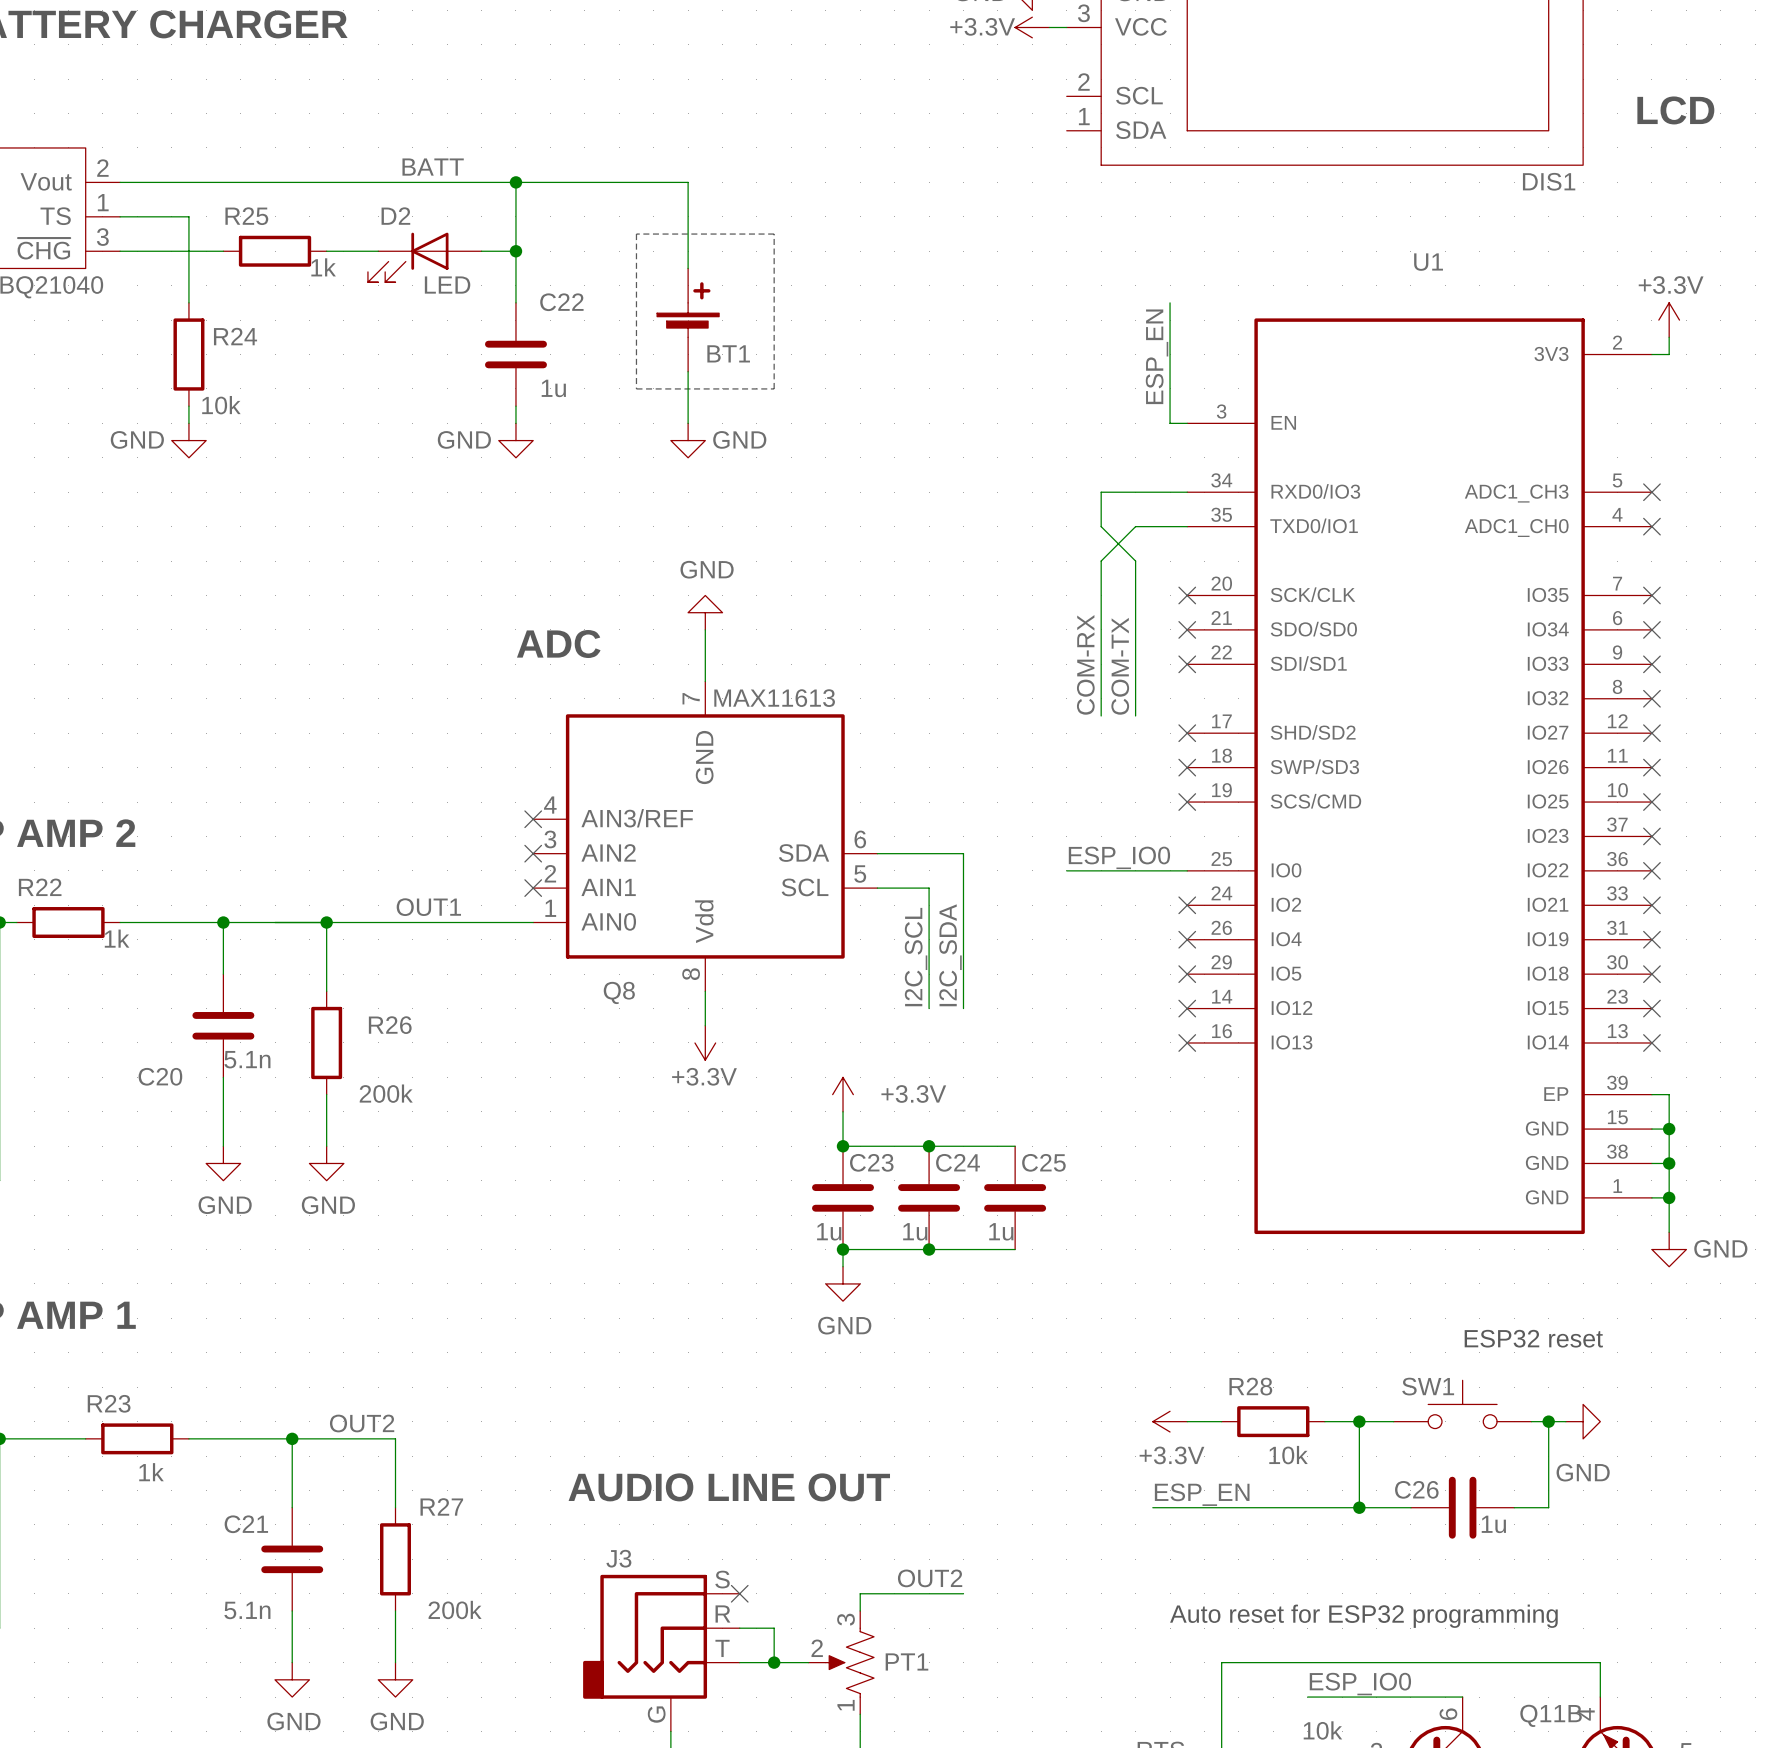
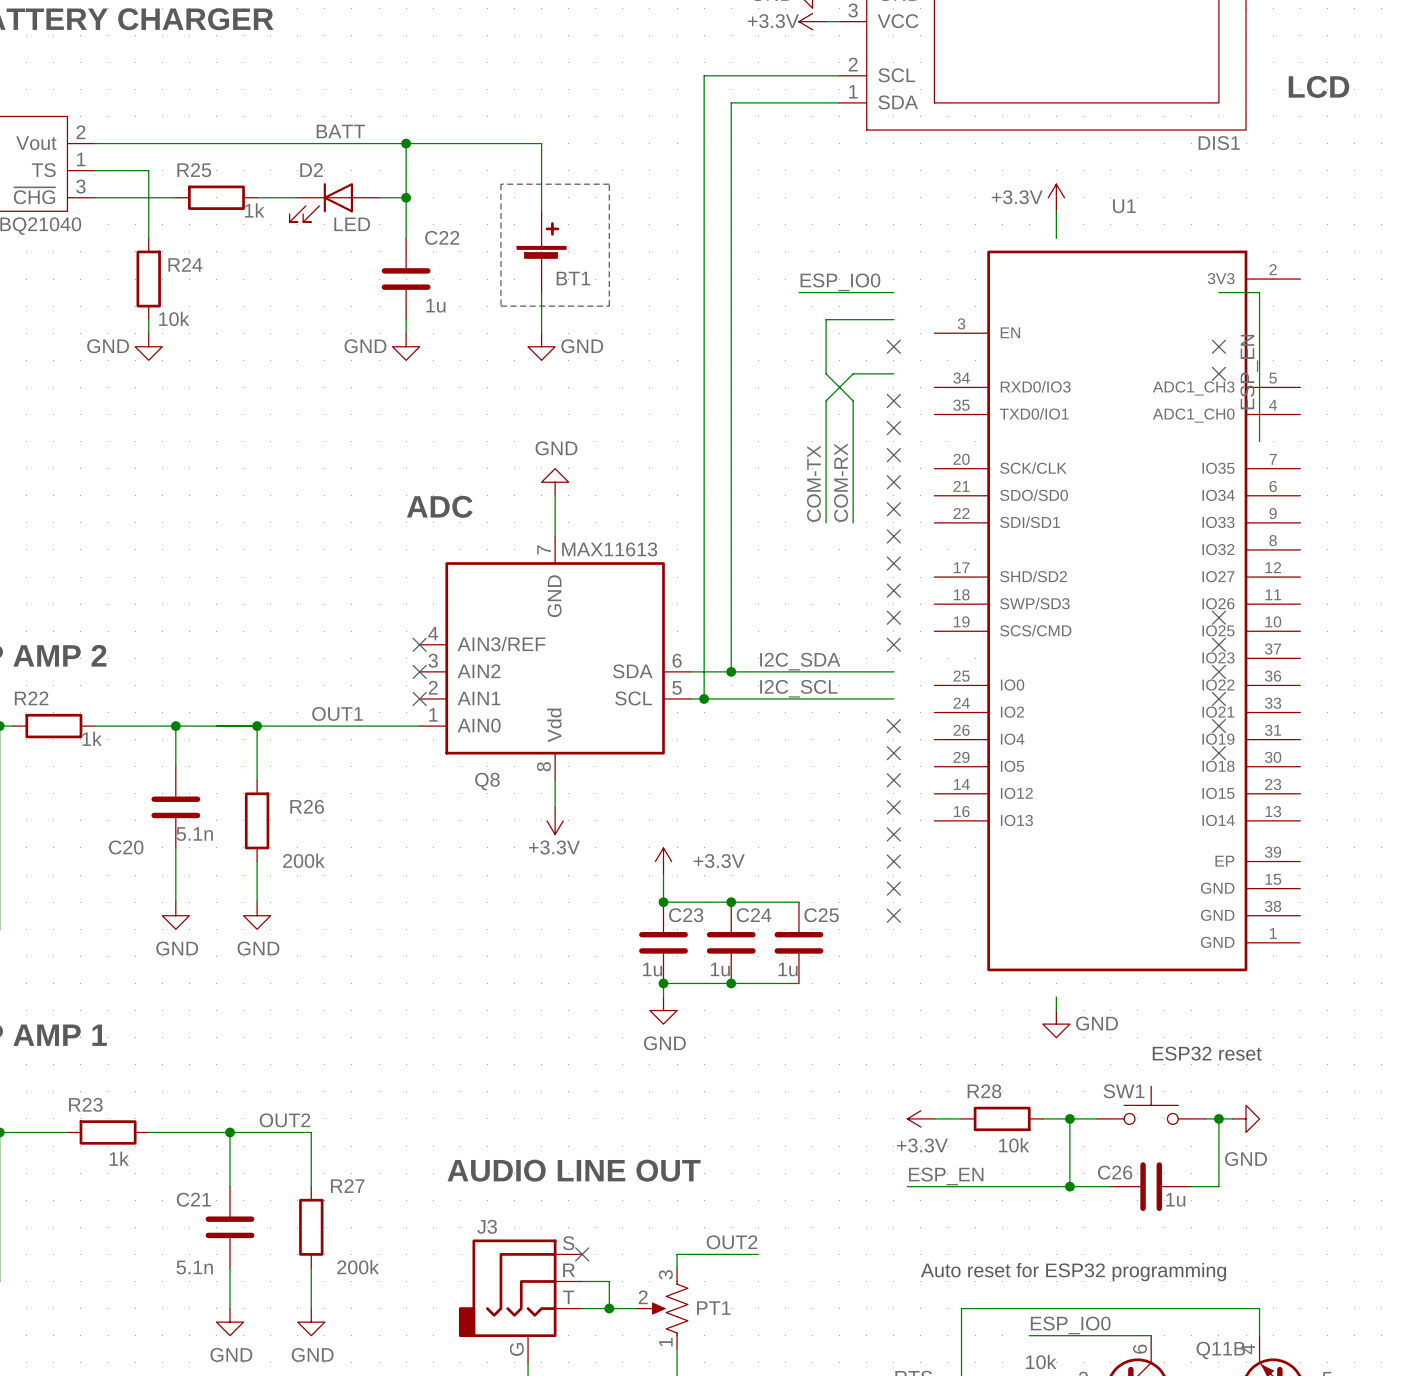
wire: none -> (839, 75) (704, 75) (704, 698)
wire: none -> (839, 102) (731, 102) (731, 671)
wire: none -> (1056, 211) (1056, 238)
power symbol text position: +3.3V (1671, 285) -> +3.3V (1017, 197)
wire: (1170, 302) (1170, 423) (1187, 423) -> none
power symbol position: +3.3V (1669, 320) -> +3.3V (1056, 197)
wire: (1669, 337) (1669, 354) (1651, 354) -> none
label: ESP_EN (1157, 356) -> ESP_IO0 (840, 282)
wire: none -> (798, 292) (893, 292)
wire: none -> (1218, 292) (1259, 292) (1259, 441)
wire: none -> (893, 319) (826, 319) (826, 373) (853, 400) (853, 522)
no-connect mark: none -> (893, 346)
no-connect mark: none -> (1218, 346)
label: none -> ESP_EN (1249, 372)
no-connect mark: none -> (1218, 373)
wire: (1187, 492) (1101, 492) (1101, 526) (1135, 561) (1135, 715) -> none
no-connect mark: (1651, 492) -> none
no-connect mark: none -> (893, 400)
wire: (1187, 526) (1135, 526) (1101, 561) (1101, 715) -> (893, 373) (853, 373) (826, 400) (826, 522)
no-connect mark: (1651, 526) -> none
no-connect mark: none -> (893, 428)
no-connect mark: none -> (893, 455)
no-connect mark: (1187, 595) -> none
no-connect mark: (1651, 595) -> none
no-connect mark: none -> (893, 482)
no-connect mark: (1187, 629) -> none
no-connect mark: (1651, 629) -> none
no-connect mark: none -> (893, 509)
label position: COM-RX (1085, 664) -> COM-RX (841, 482)
no-connect mark: (1187, 664) -> none
no-connect mark: (1651, 664) -> none
label position: COM-TX (1120, 666) -> COM-TX (813, 483)
no-connect mark: none -> (893, 536)
no-connect mark: (1651, 698) -> none
no-connect mark: none -> (893, 563)
no-connect mark: (1187, 733) -> none
no-connect mark: (1651, 733) -> none
no-connect mark: none -> (893, 590)
no-connect mark: (1187, 767) -> none
no-connect mark: (1651, 767) -> none
no-connect mark: none -> (893, 617)
no-connect mark: none -> (1218, 617)
no-connect mark: (1187, 802) -> none
no-connect mark: (1651, 802) -> none
no-connect mark: none -> (893, 644)
no-connect mark: none -> (1218, 644)
no-connect mark: (1651, 836) -> none
junction: none -> (731, 671)
wire: (963, 853) (963, 1008) -> (758, 671) (893, 671)
no-connect mark: none -> (1218, 671)
label: ESP_IO0 (1119, 857) -> none
wire: (1066, 870) (1187, 870) -> none
no-connect mark: (1651, 870) -> none
junction: none -> (704, 698)
wire: (929, 888) (929, 1008) -> (731, 698) (893, 698)
no-connect mark: none -> (1218, 698)
no-connect mark: (1187, 905) -> none
no-connect mark: (1651, 905) -> none
no-connect mark: none -> (893, 726)
no-connect mark: none -> (1218, 726)
no-connect mark: (1187, 939) -> none
no-connect mark: (1651, 939) -> none
label rotation: 0° (950, 955) -> 90° clockwise (800, 661)
label position: I2C_SDA (950, 955) -> I2C_SDA (800, 661)
no-connect mark: none -> (893, 753)
no-connect mark: none -> (1218, 753)
label rotation: 0° (916, 957) -> 90° clockwise (798, 688)
label position: I2C_SCL (916, 957) -> I2C_SCL (798, 688)
no-connect mark: (1187, 974) -> none
no-connect mark: (1651, 974) -> none
no-connect mark: none -> (893, 780)
no-connect mark: (1187, 1008) -> none
no-connect mark: (1651, 1008) -> none
no-connect mark: none -> (893, 807)
no-connect mark: (1187, 1042) -> none
no-connect mark: (1651, 1042) -> none
no-connect mark: none -> (893, 834)
no-connect mark: none -> (893, 861)
wire: (1651, 1094) (1669, 1094) (1669, 1232) -> none
no-connect mark: none -> (893, 888)
wire: (1651, 1129) (1669, 1129) -> none
junction: (1669, 1129) -> none
no-connect mark: none -> (893, 915)
wire: (1651, 1163) (1669, 1163) -> none
junction: (1669, 1163) -> none
wire: (1651, 1197) (1669, 1197) -> none
junction: (1669, 1197) -> none
power symbol position: GND (1669, 1249) -> GND (1056, 1024)
wire: none -> (1056, 997) (1056, 1010)

